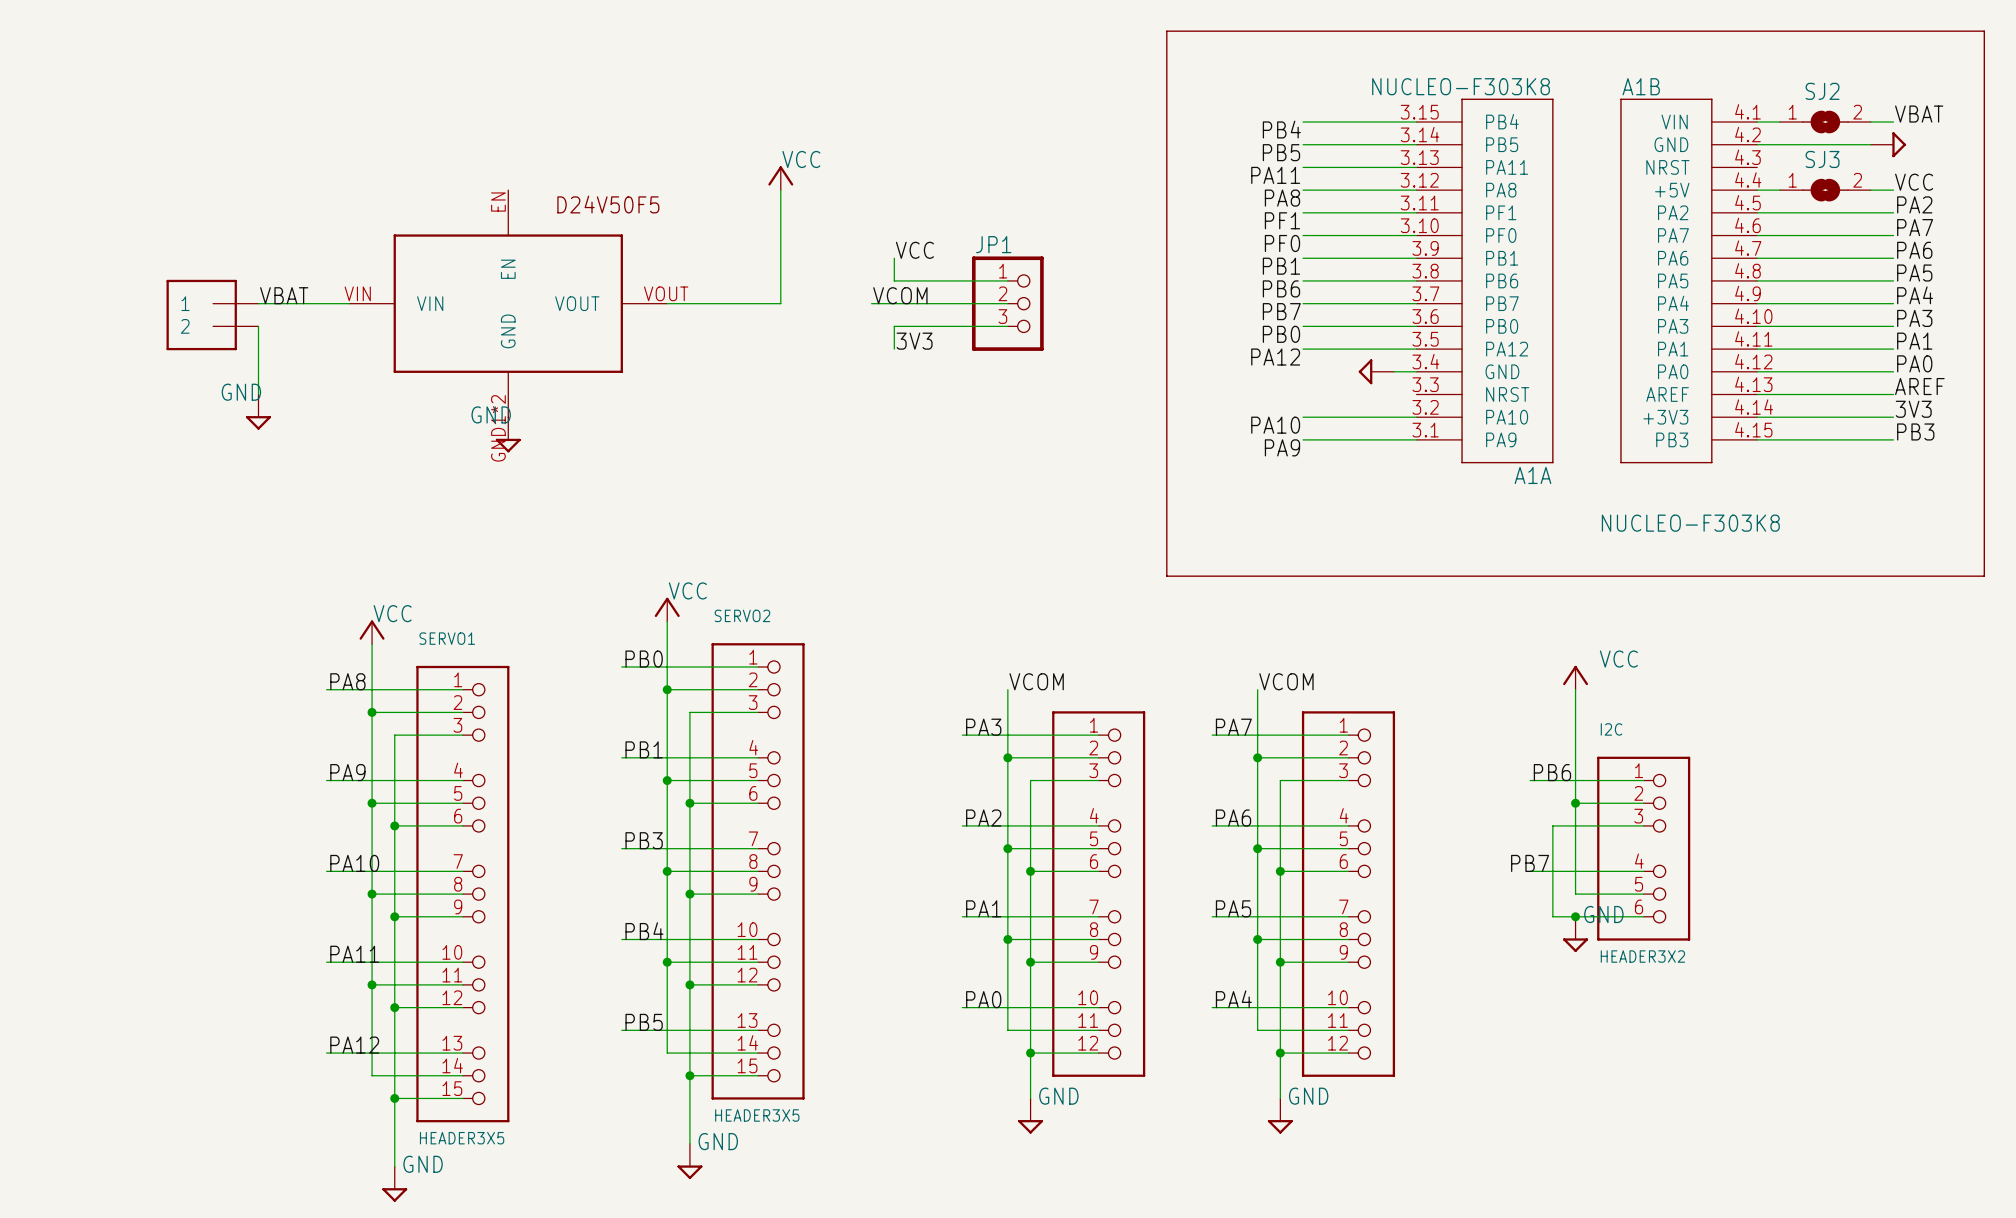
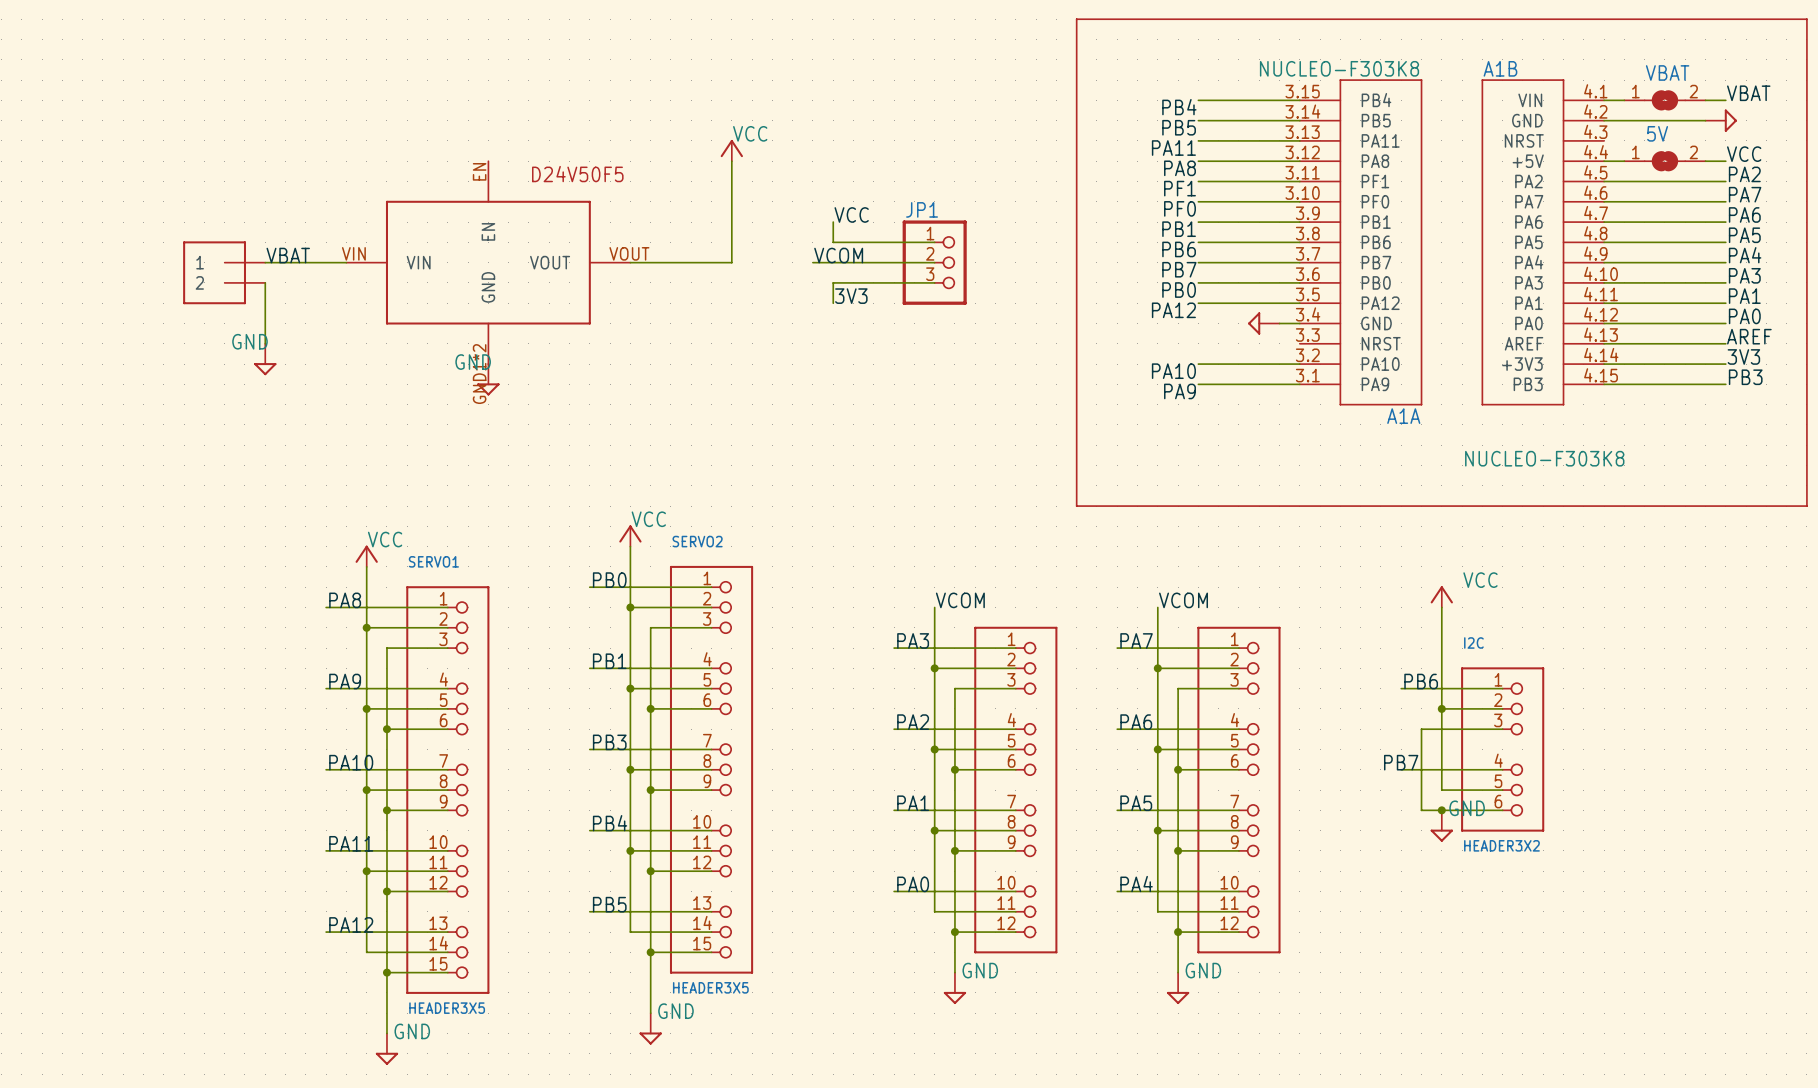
SJ2 name: SJ2 (1822, 91) -> VBAT (1667, 72)
SJ3 name: SJ3 (1822, 159) -> 5V (1657, 133)

